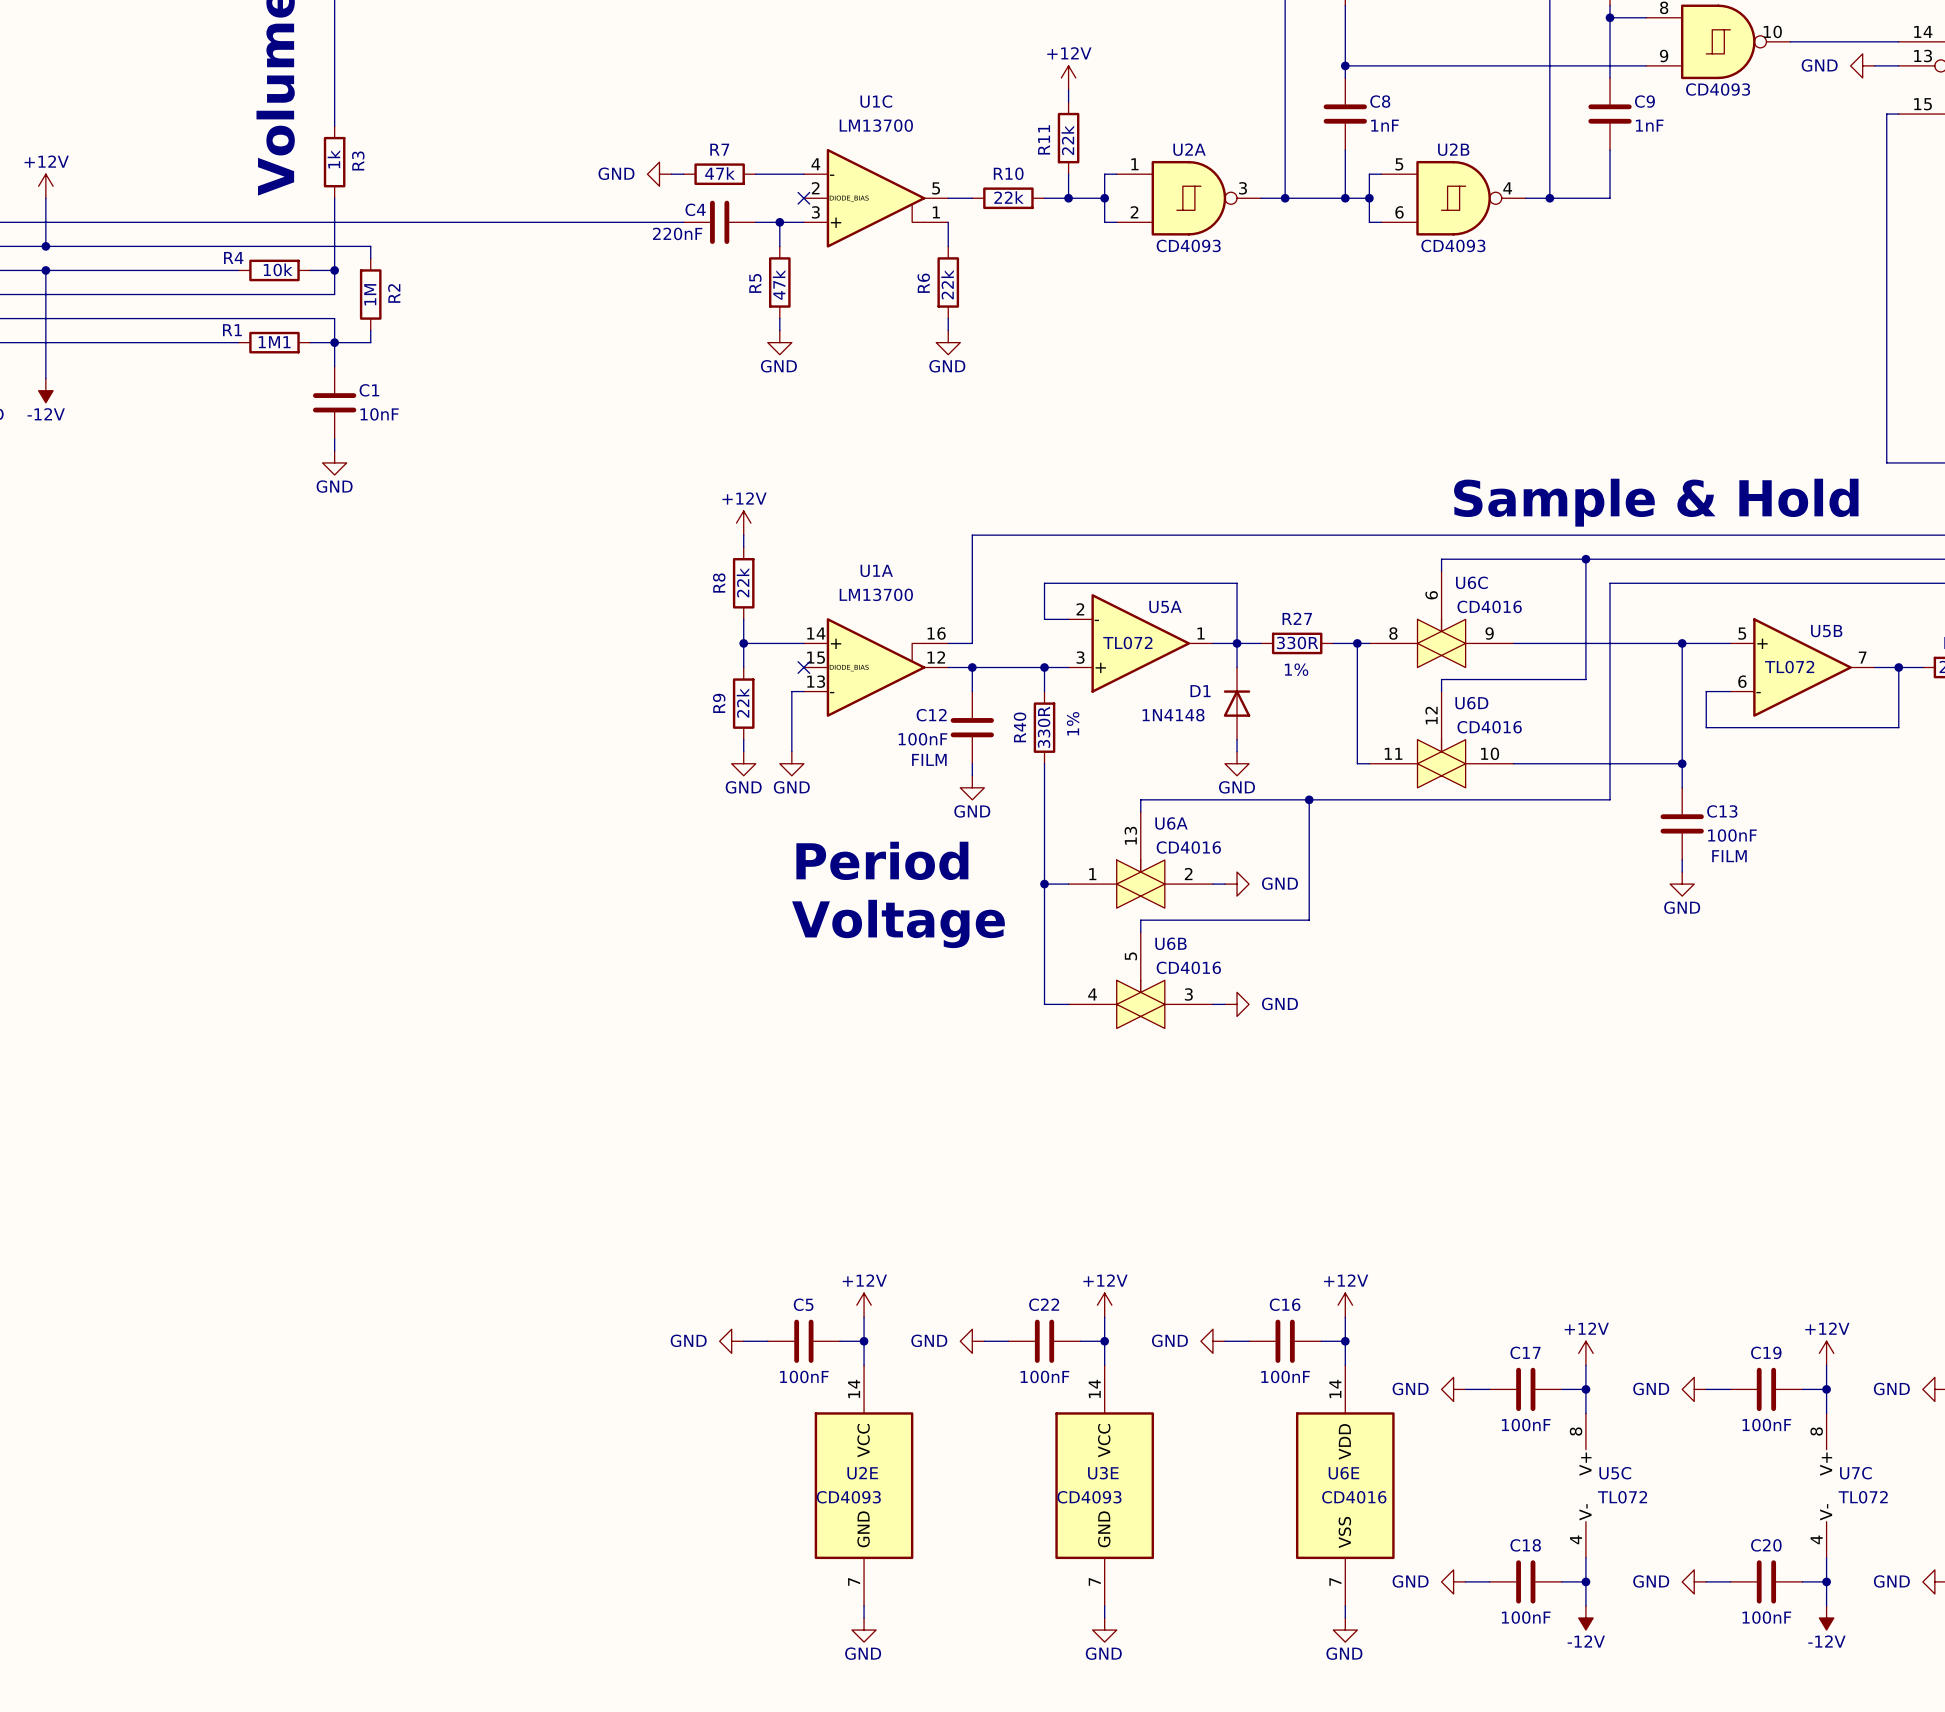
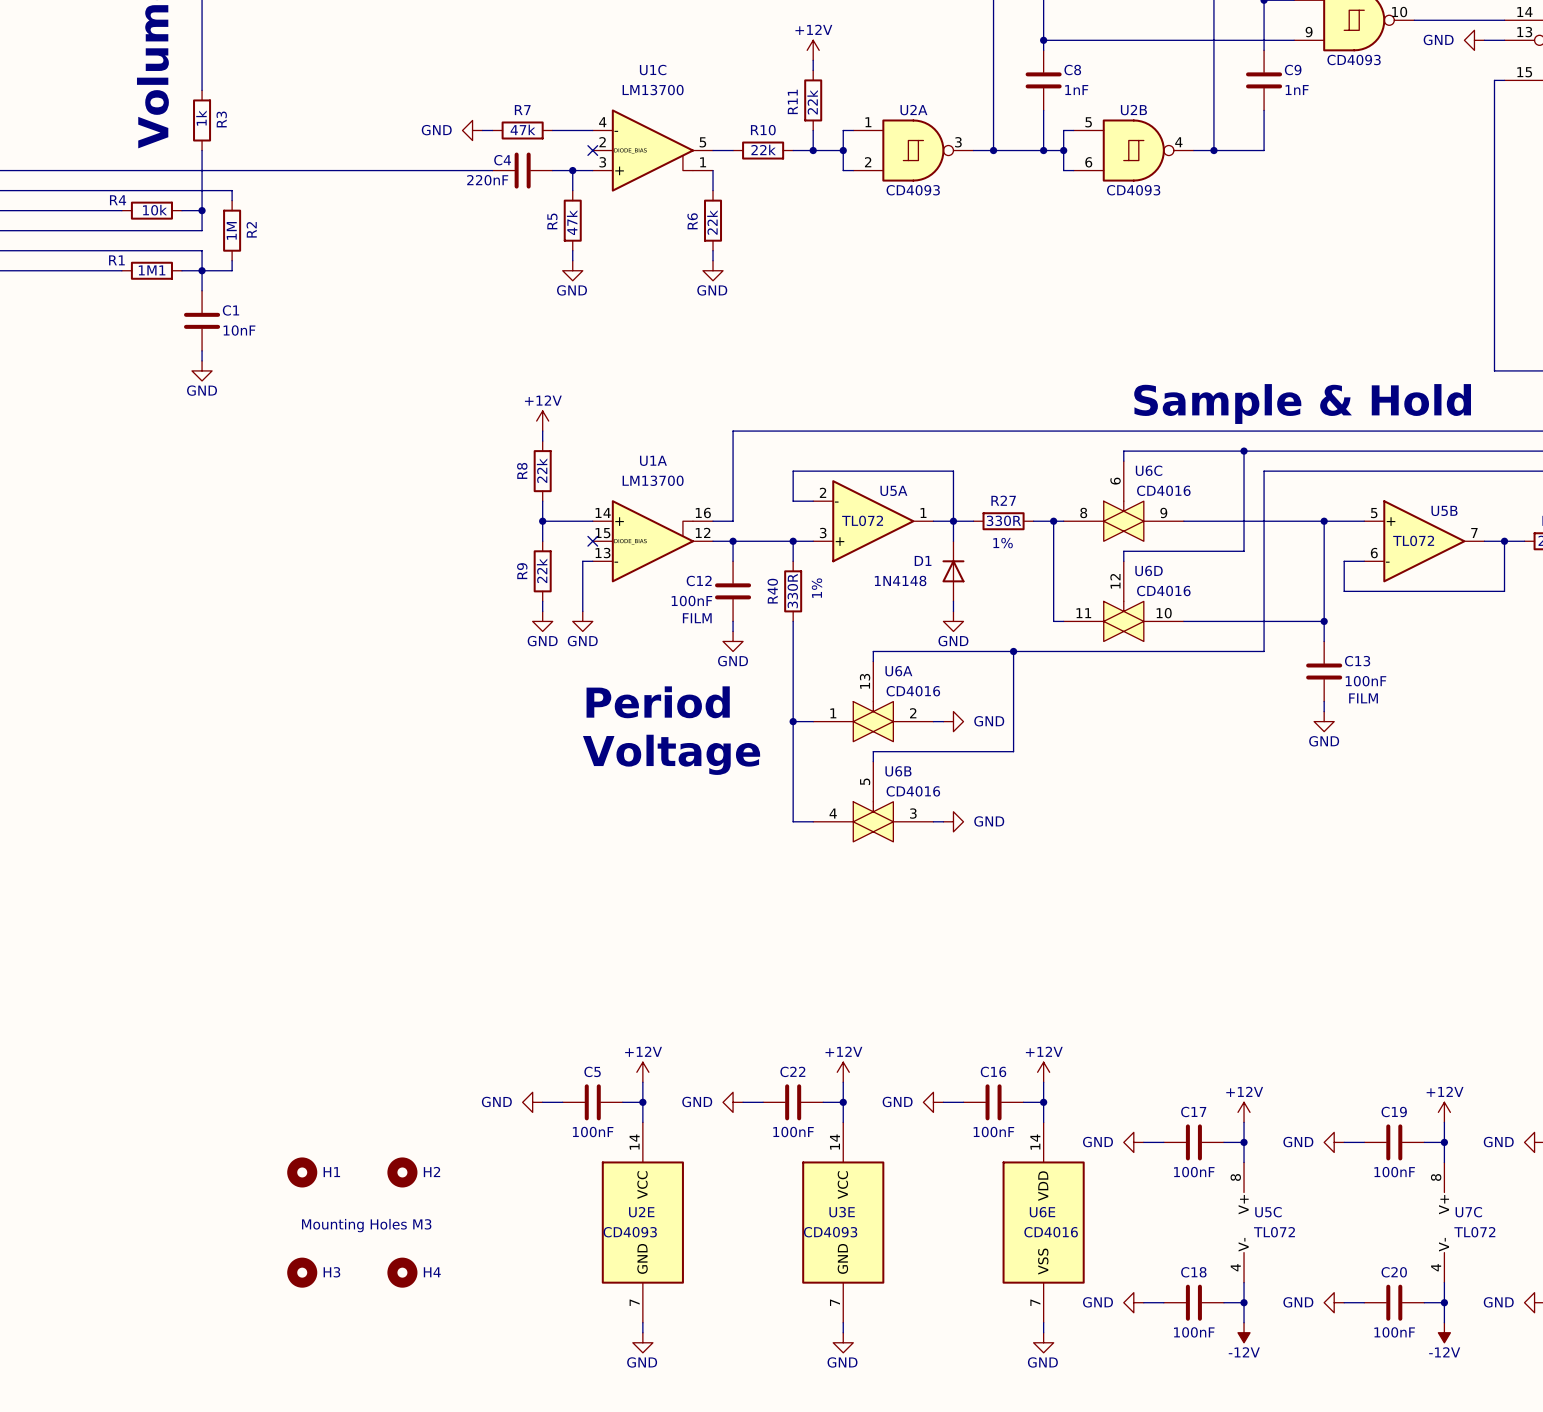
H1: none -> (302, 1172)
H2: none -> (402, 1172)
text: none -> Mounting Holes M3 (366, 1225)
H3: none -> (302, 1272)
H4: none -> (402, 1272)

